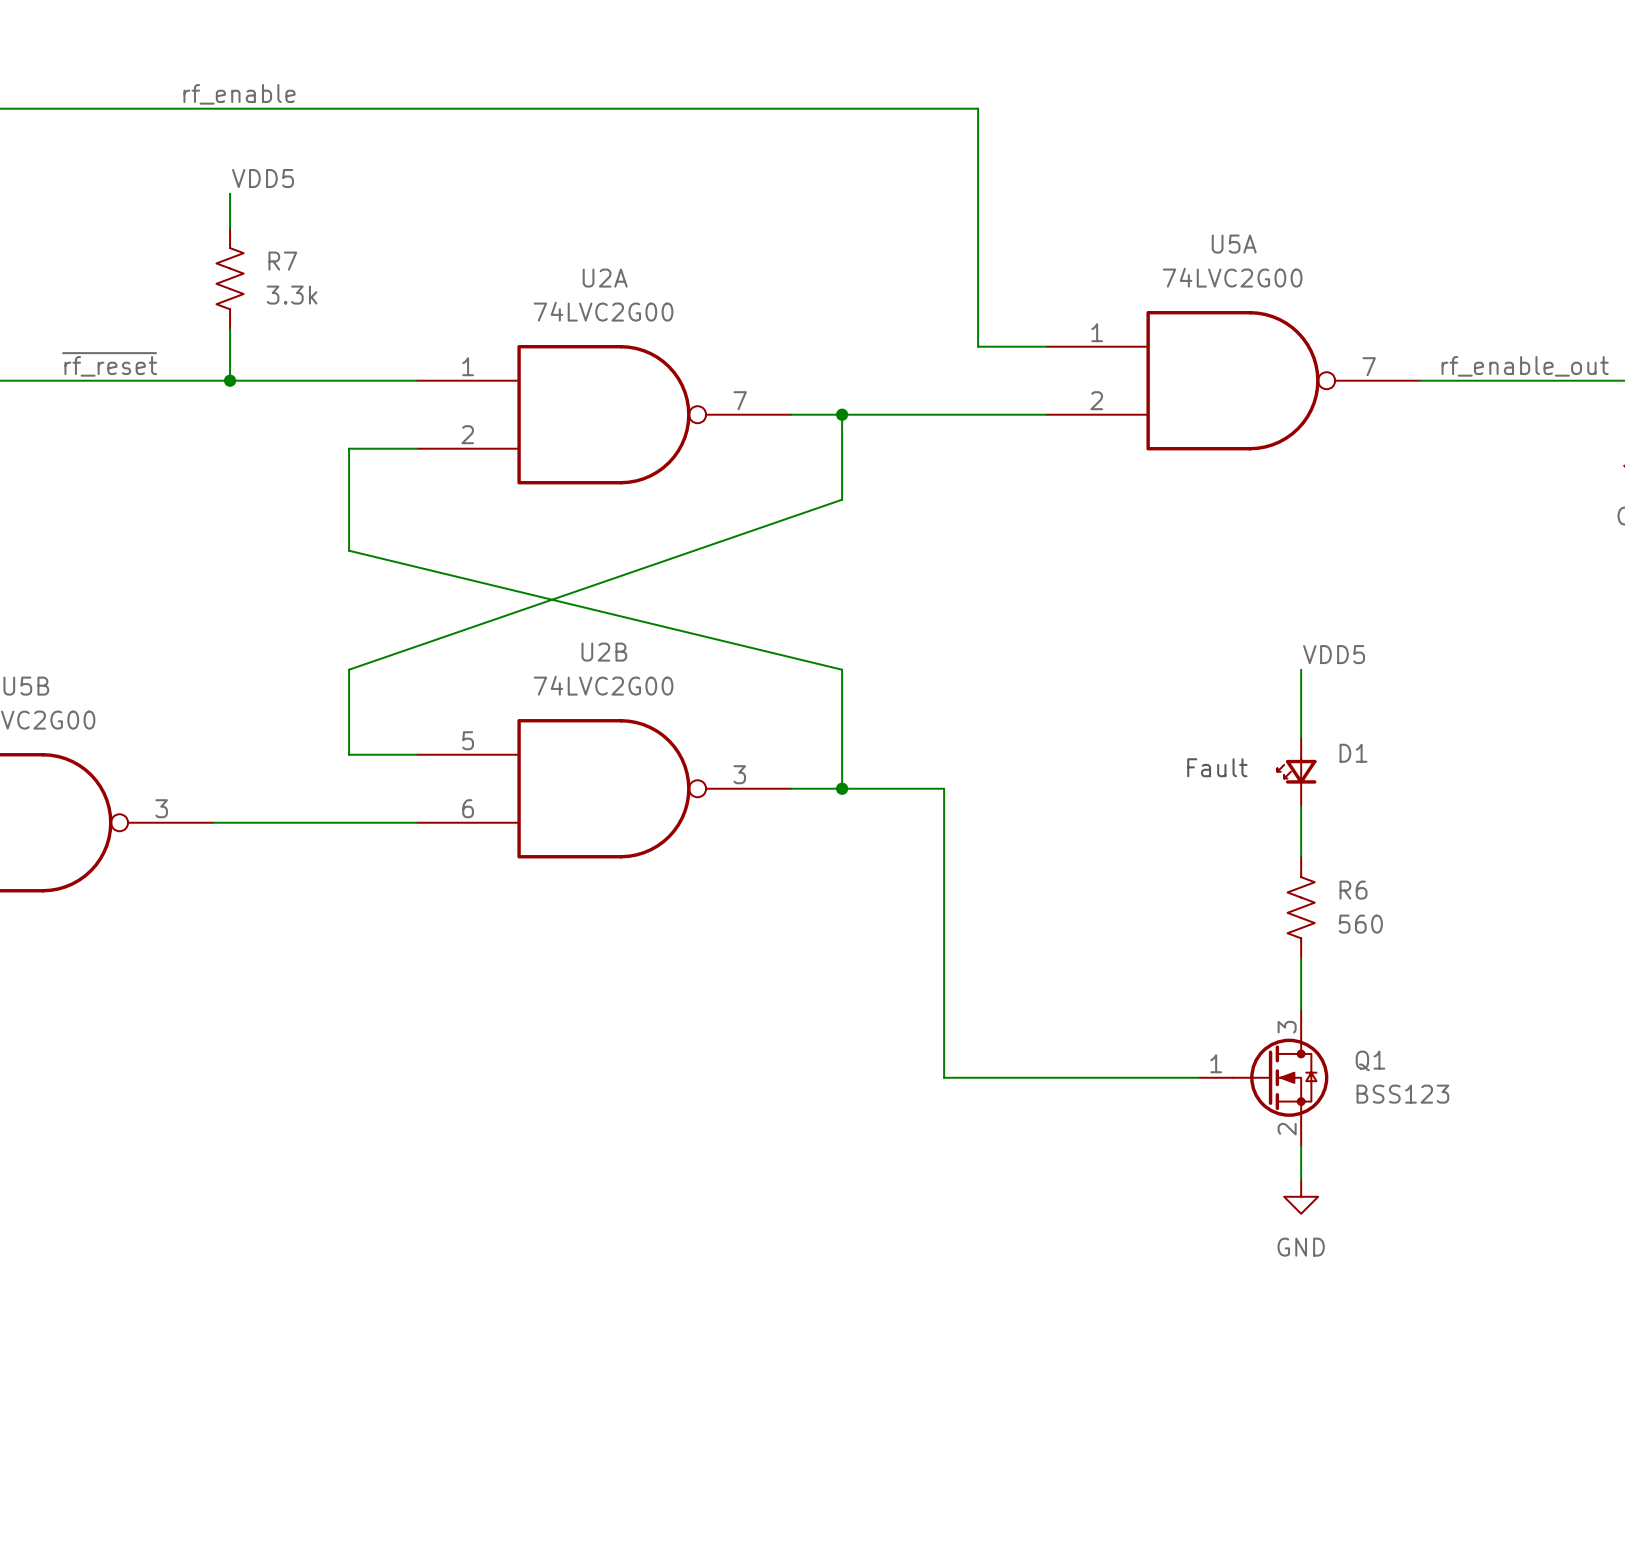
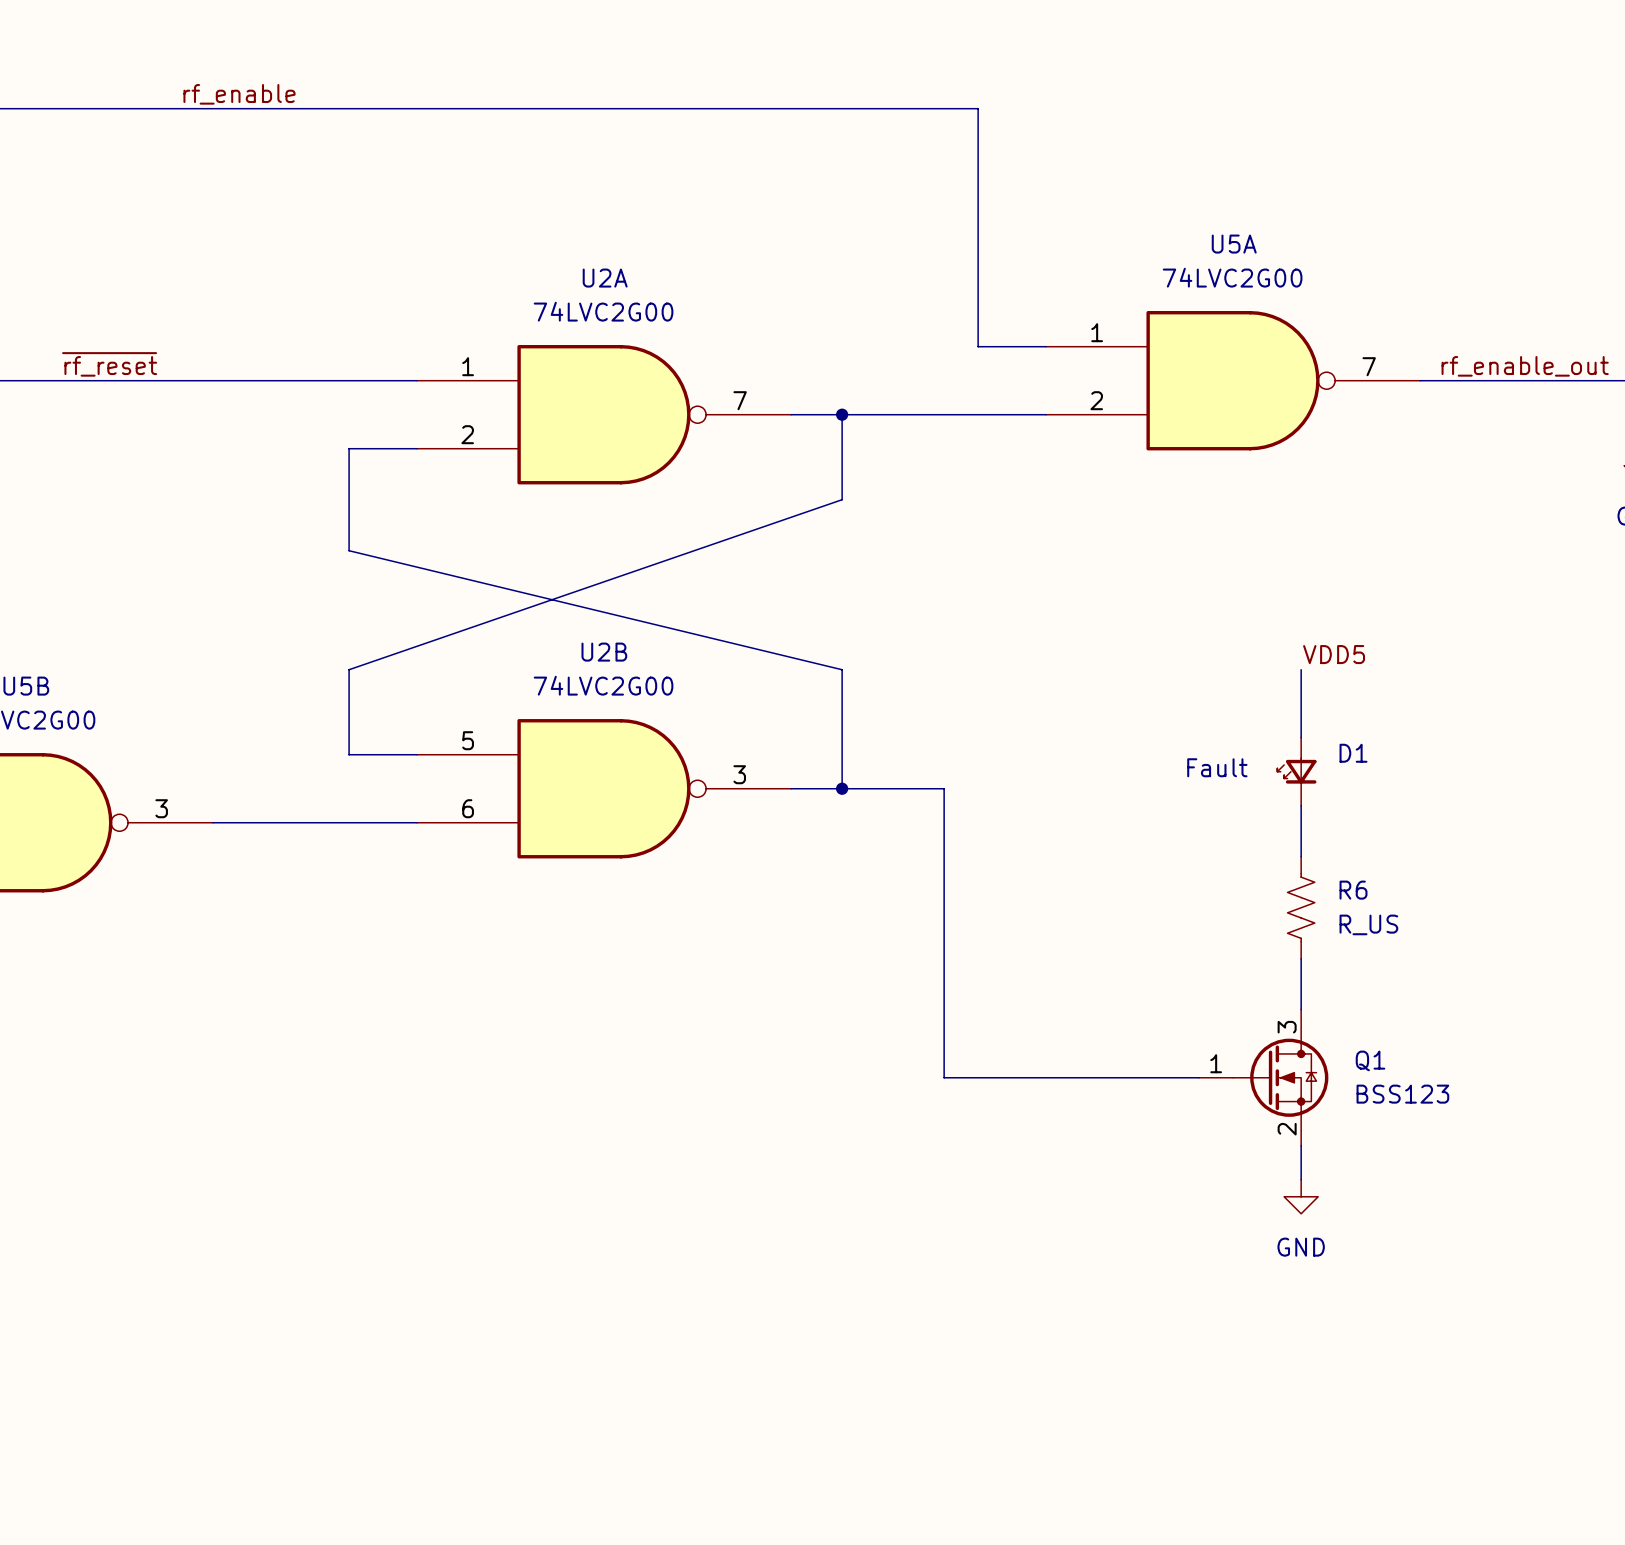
label: VDD5 (262, 178) -> none
wire: (230, 193) (230, 227) -> none
R7: 3.3k (230, 278) -> none
wire: (230, 329) (230, 380) -> none
junction: (230, 380) -> none
R6 value: 560 (1360, 924) -> R_US (1368, 924)

